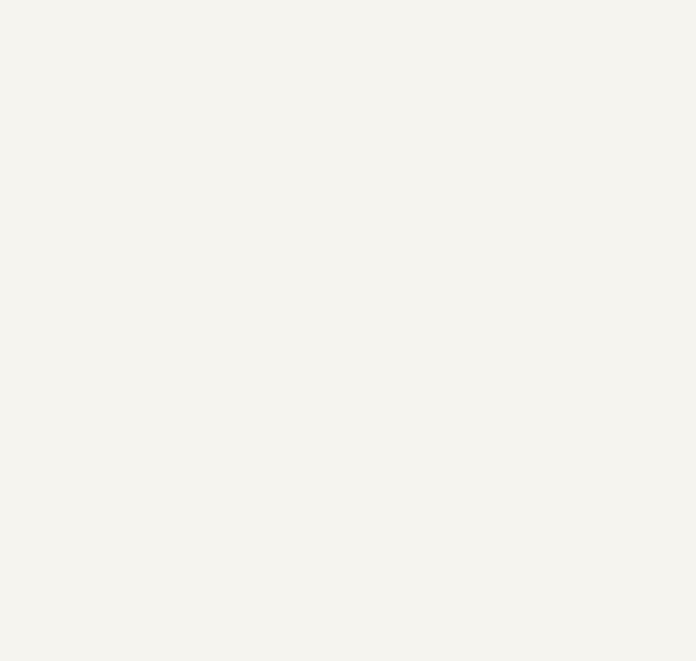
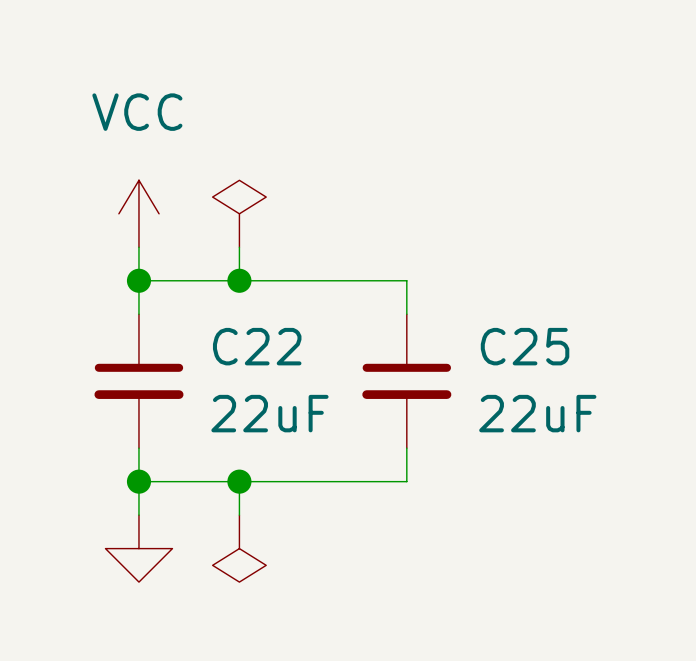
power symbol: none -> VCC (138, 213)
power symbol: none -> (239, 213)
wire: none -> (138, 247) (138, 314)
wire: none -> (239, 247) (239, 280)
wire: none -> (138, 280) (406, 280) (406, 314)
junction: none -> (138, 280)
junction: none -> (239, 280)
C22: none -> 22uF (138, 381)
C25: none -> 22uF (406, 381)
wire: none -> (138, 448) (138, 515)
wire: none -> (406, 448) (406, 481) (138, 481)
junction: none -> (138, 481)
wire: none -> (239, 481) (239, 515)
junction: none -> (239, 481)
power symbol: none -> (138, 548)
power symbol: none -> (239, 548)

